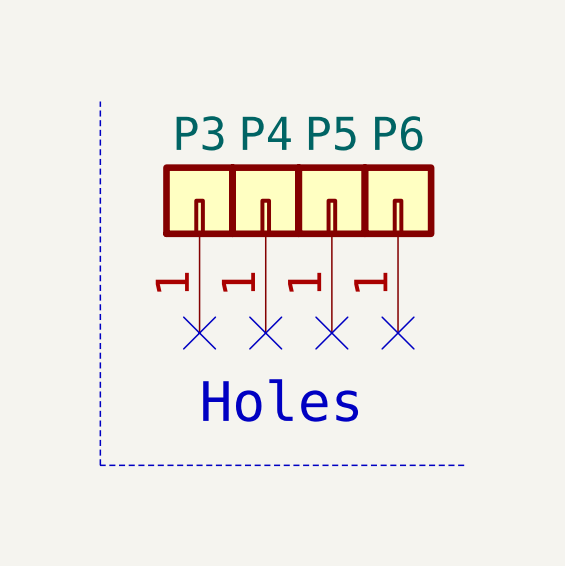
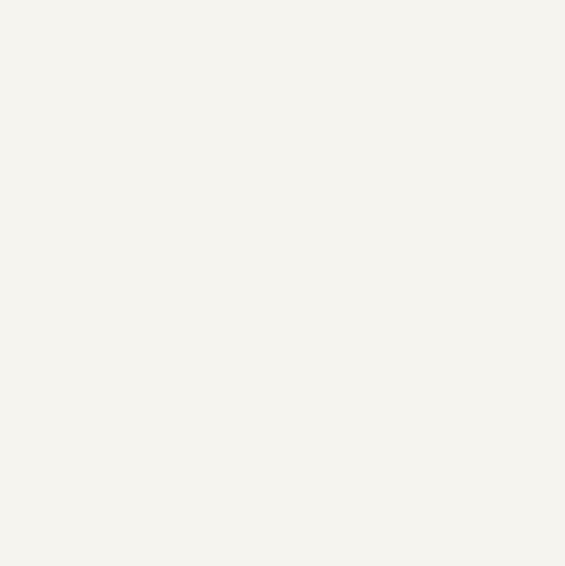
line: (100, 101) (100, 465) (464, 465) -> none
P3: (199, 248) -> none
P4: (265, 248) -> none
P5: (331, 248) -> none
P6: (398, 248) -> none
no-connect mark: (199, 333) -> none
no-connect mark: (265, 333) -> none
no-connect mark: (331, 333) -> none
no-connect mark: (398, 333) -> none
text: Holes (280, 400) -> none

